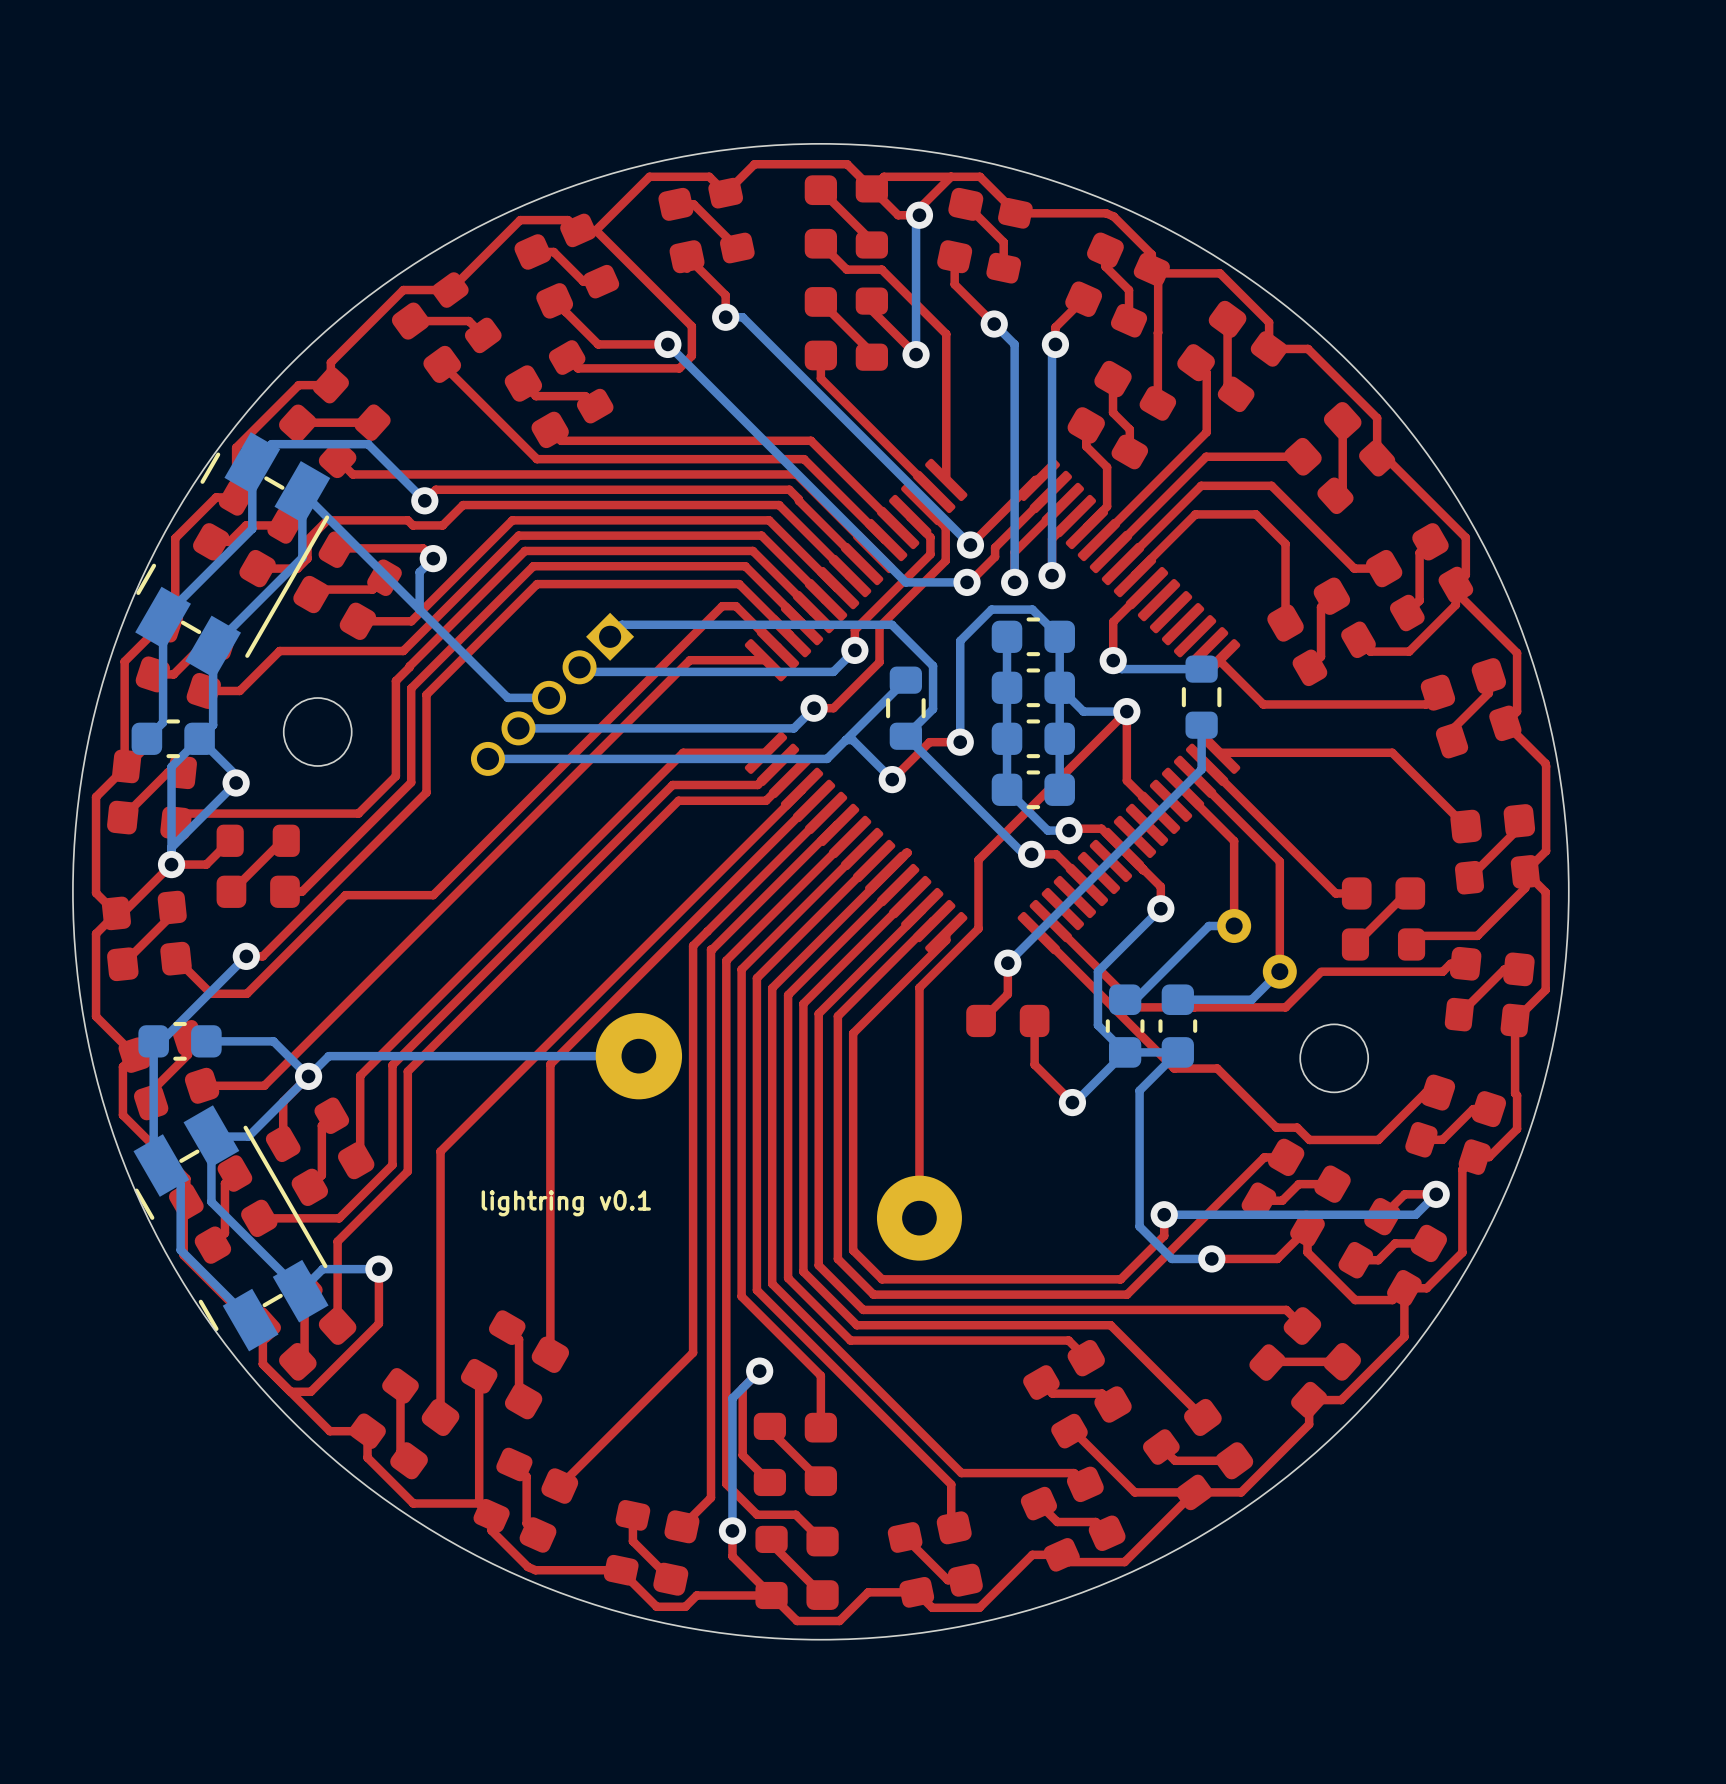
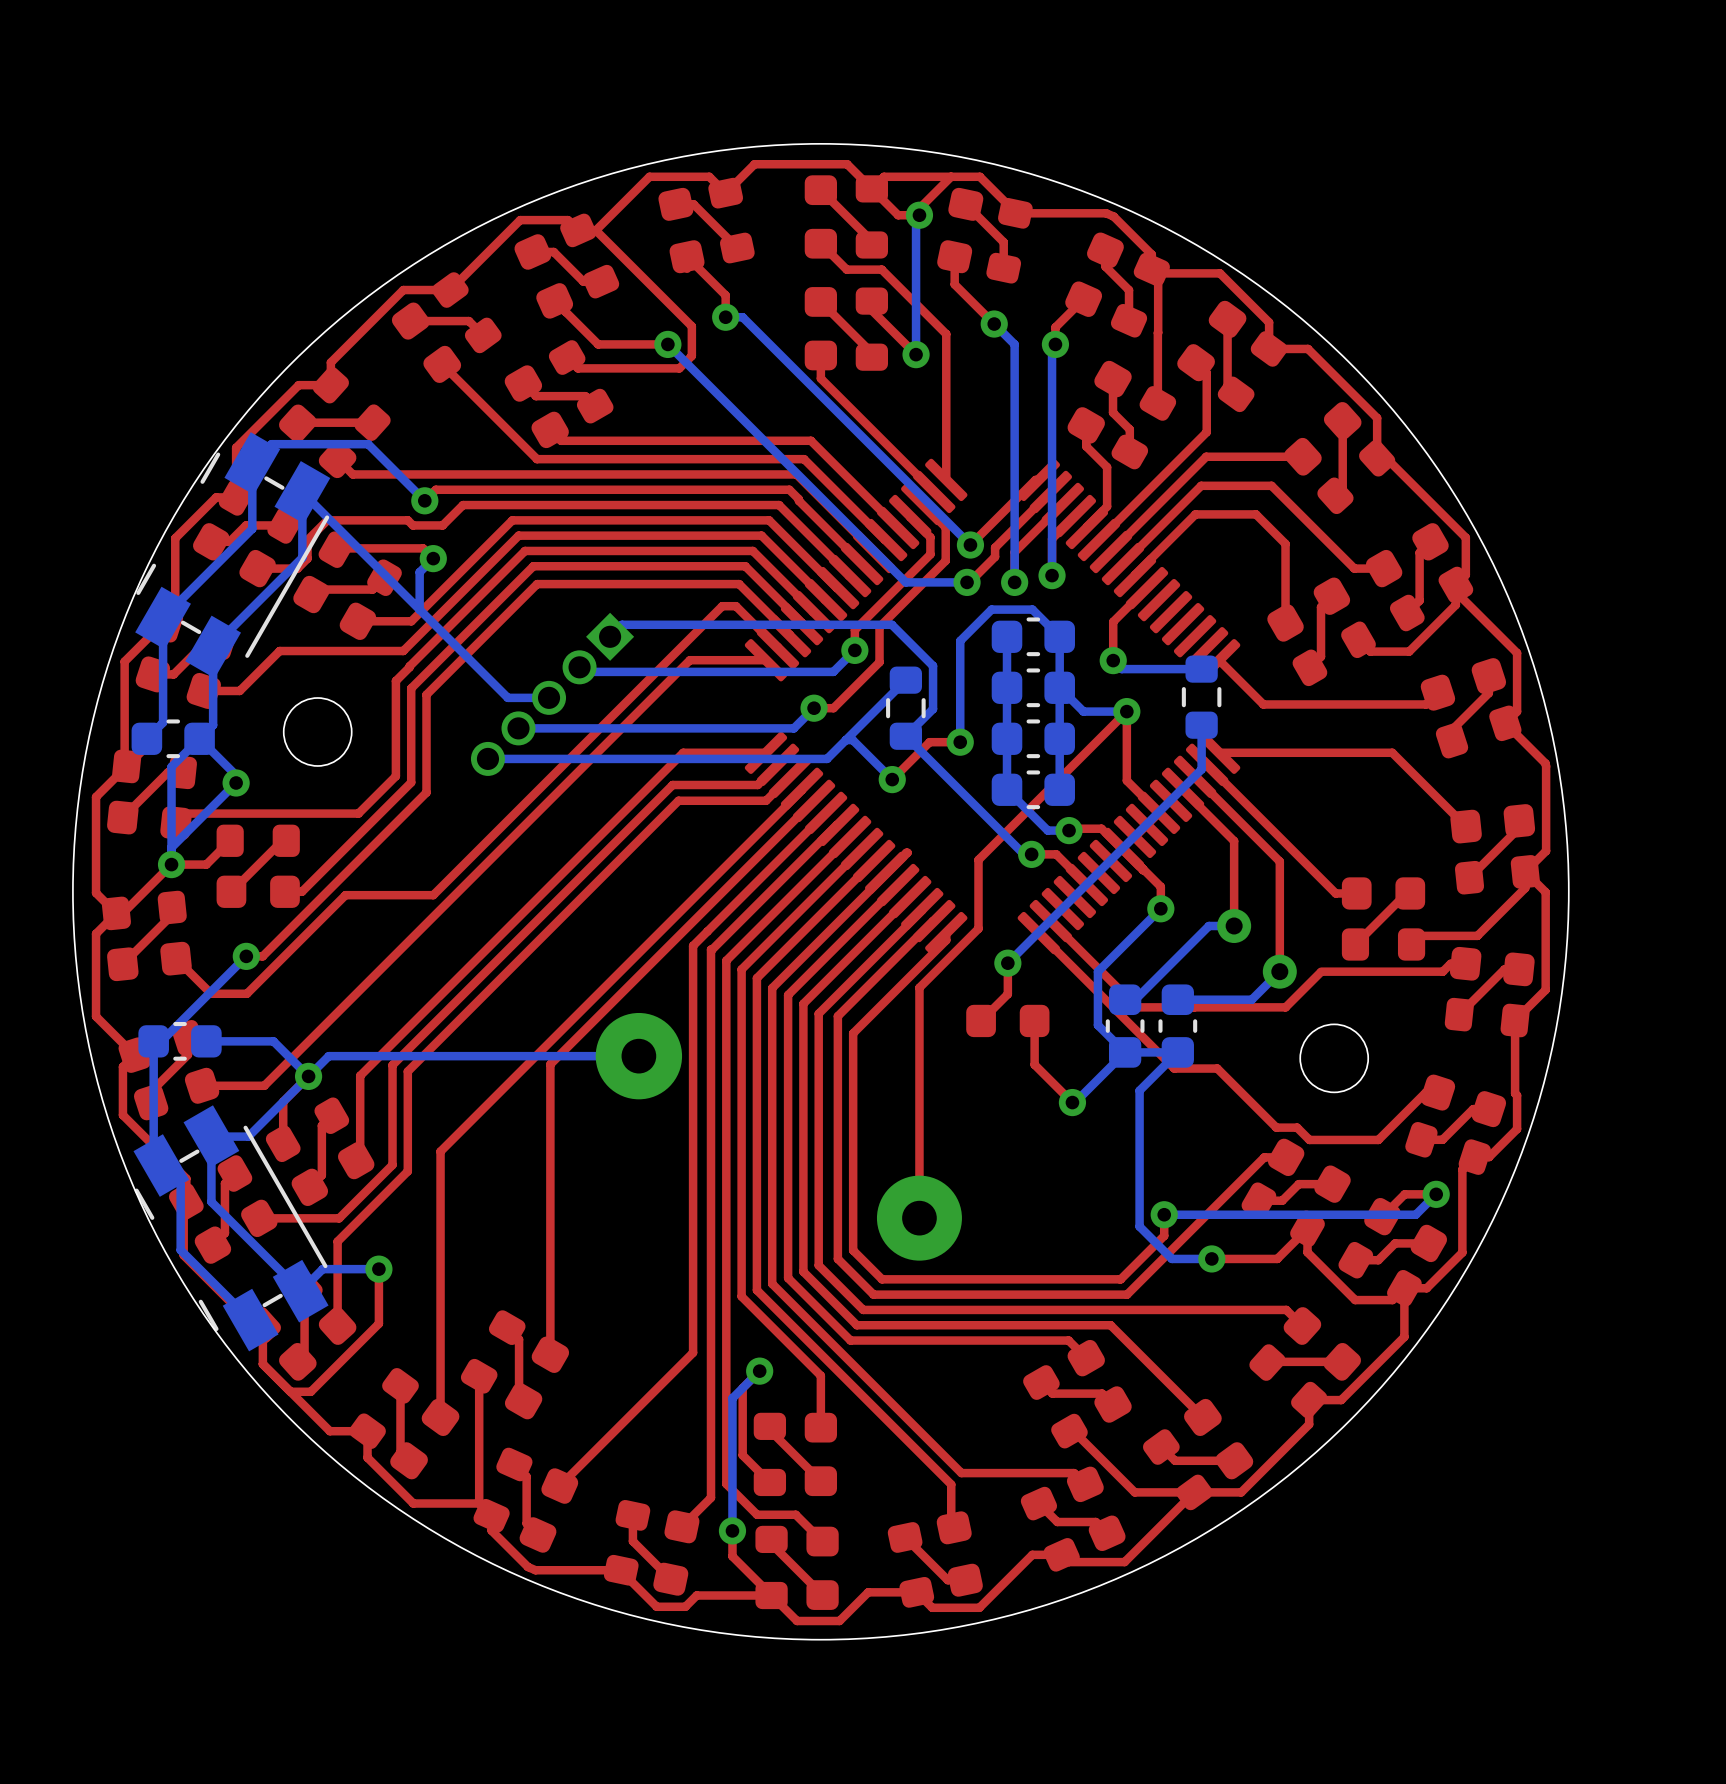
text: lightring v0.1 (566, 1203) -> none

